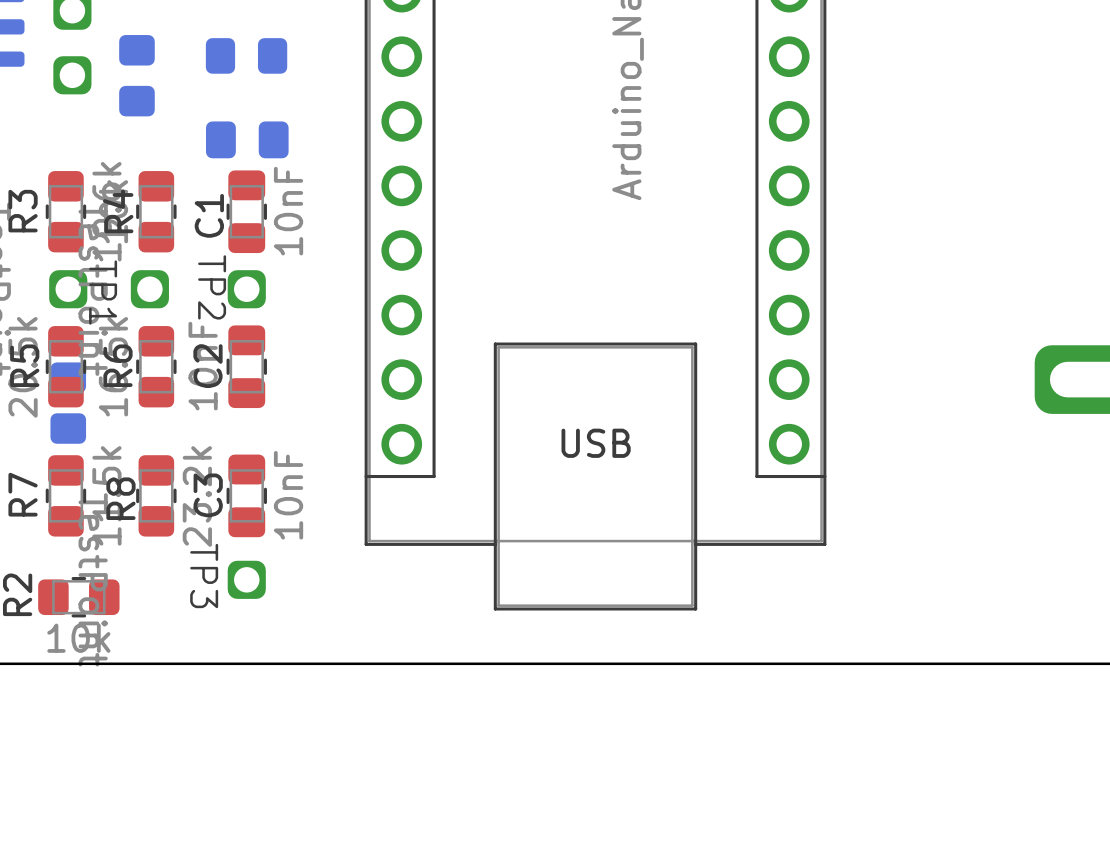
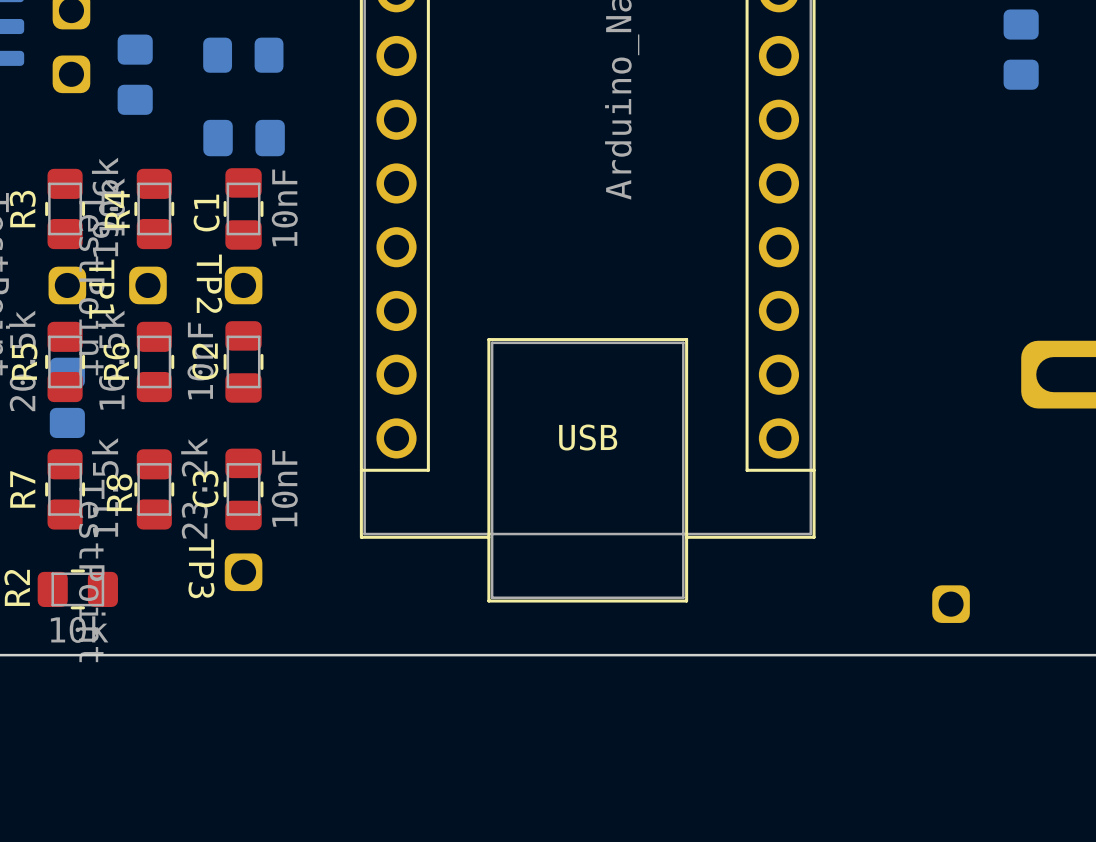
part: none -> (1021, 49)
part: none -> (951, 604)

